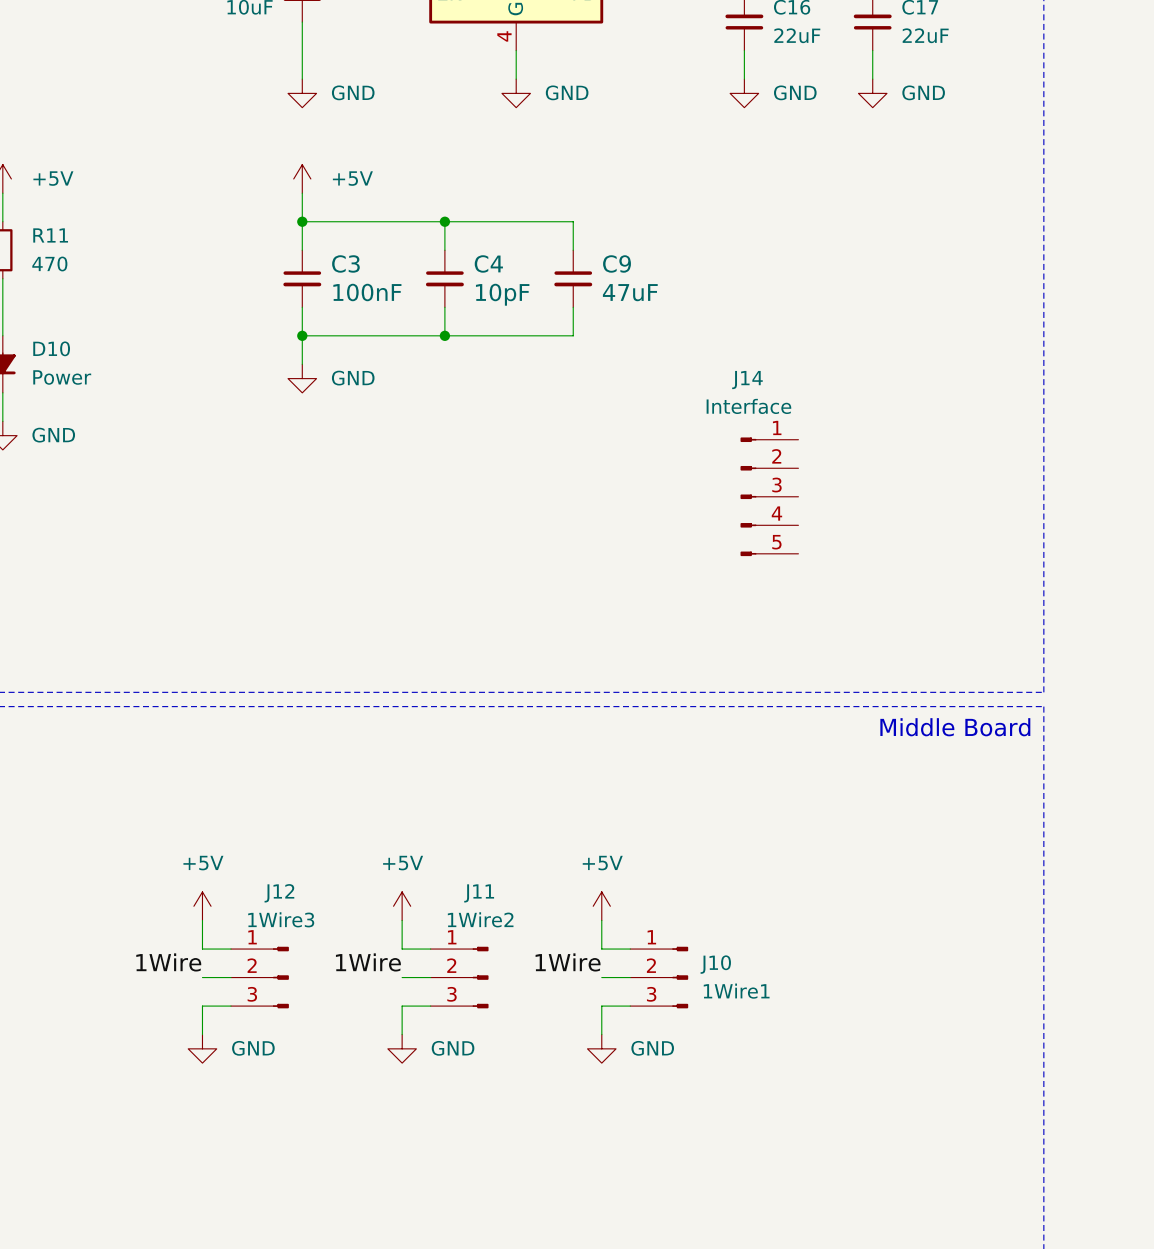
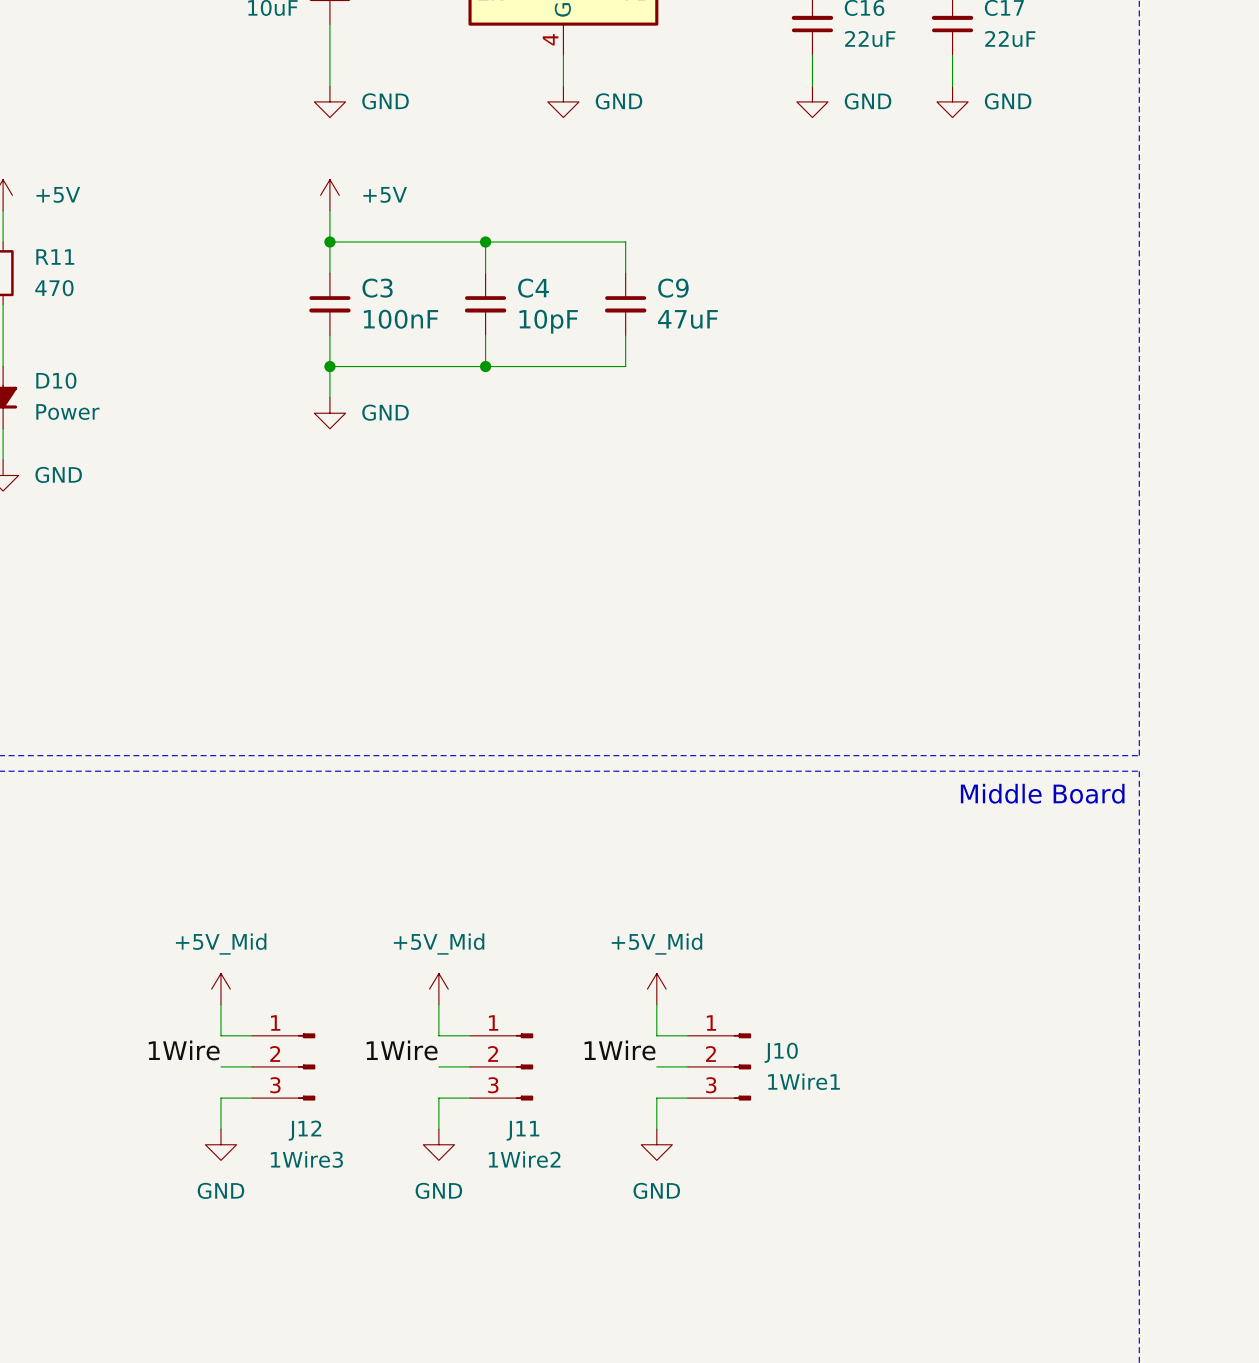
J14: Interface (769, 496) -> none
J12 name position: J12 (279, 893) -> J12 (304, 1130)
J11 name position: J11 (479, 893) -> J11 (522, 1130)
power symbol: +5V (202, 906) -> +5V_Mid (220, 989)
power symbol: +5V (402, 906) -> +5V_Mid (438, 989)
power symbol: +5V (601, 906) -> +5V_Mid (656, 989)
J12 value position: 1Wire3 (281, 919) -> 1Wire3 (306, 1159)
J11 value position: 1Wire2 (480, 919) -> 1Wire2 (524, 1159)
power symbol text position: GND (253, 1048) -> GND (220, 1190)
power symbol text position: GND (453, 1048) -> GND (438, 1190)
power symbol text position: GND (652, 1048) -> GND (656, 1190)

